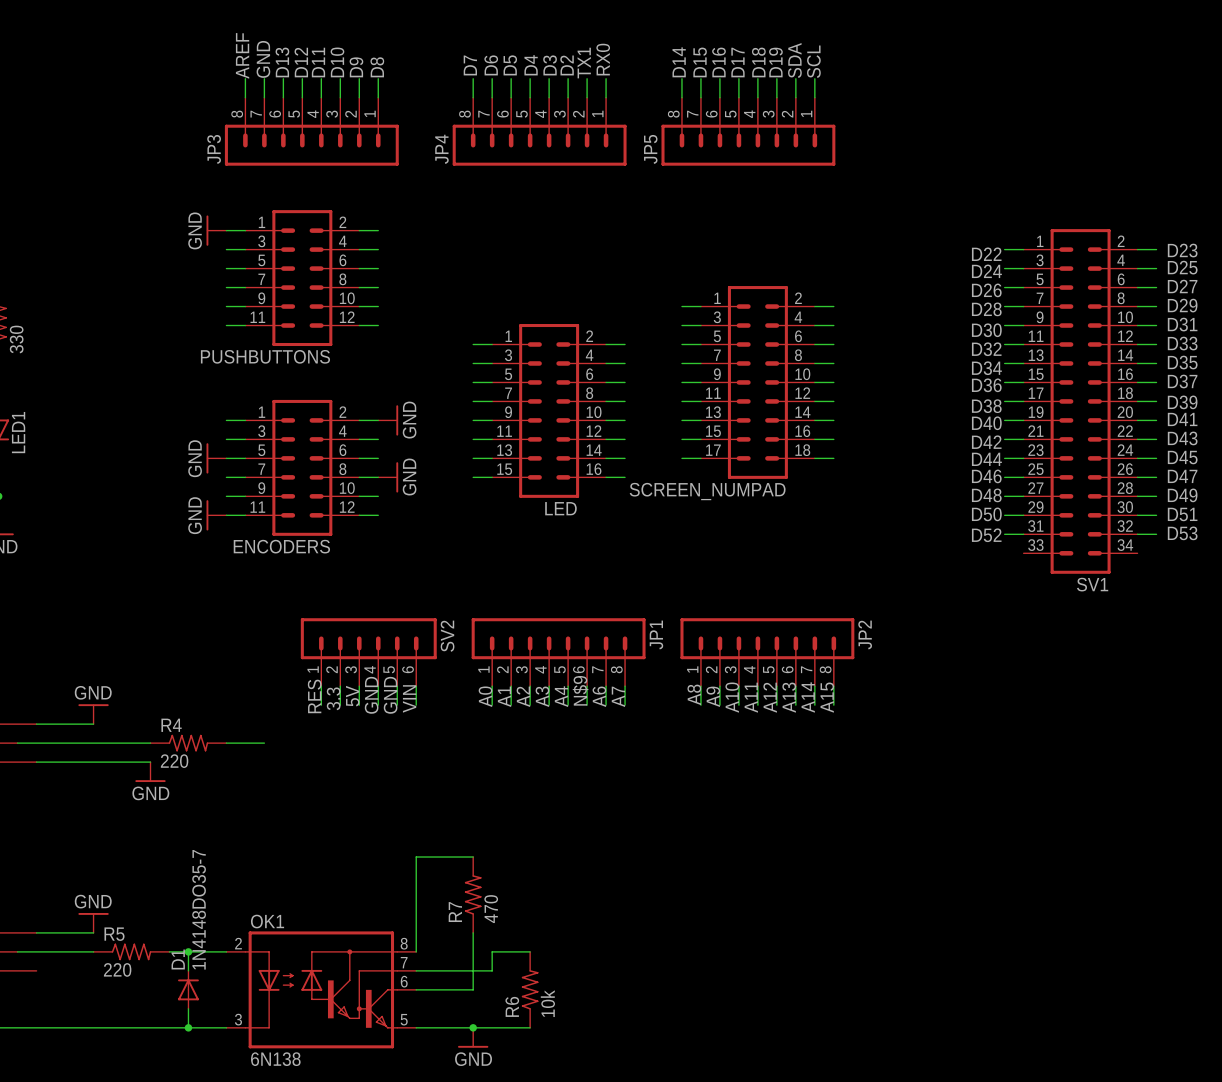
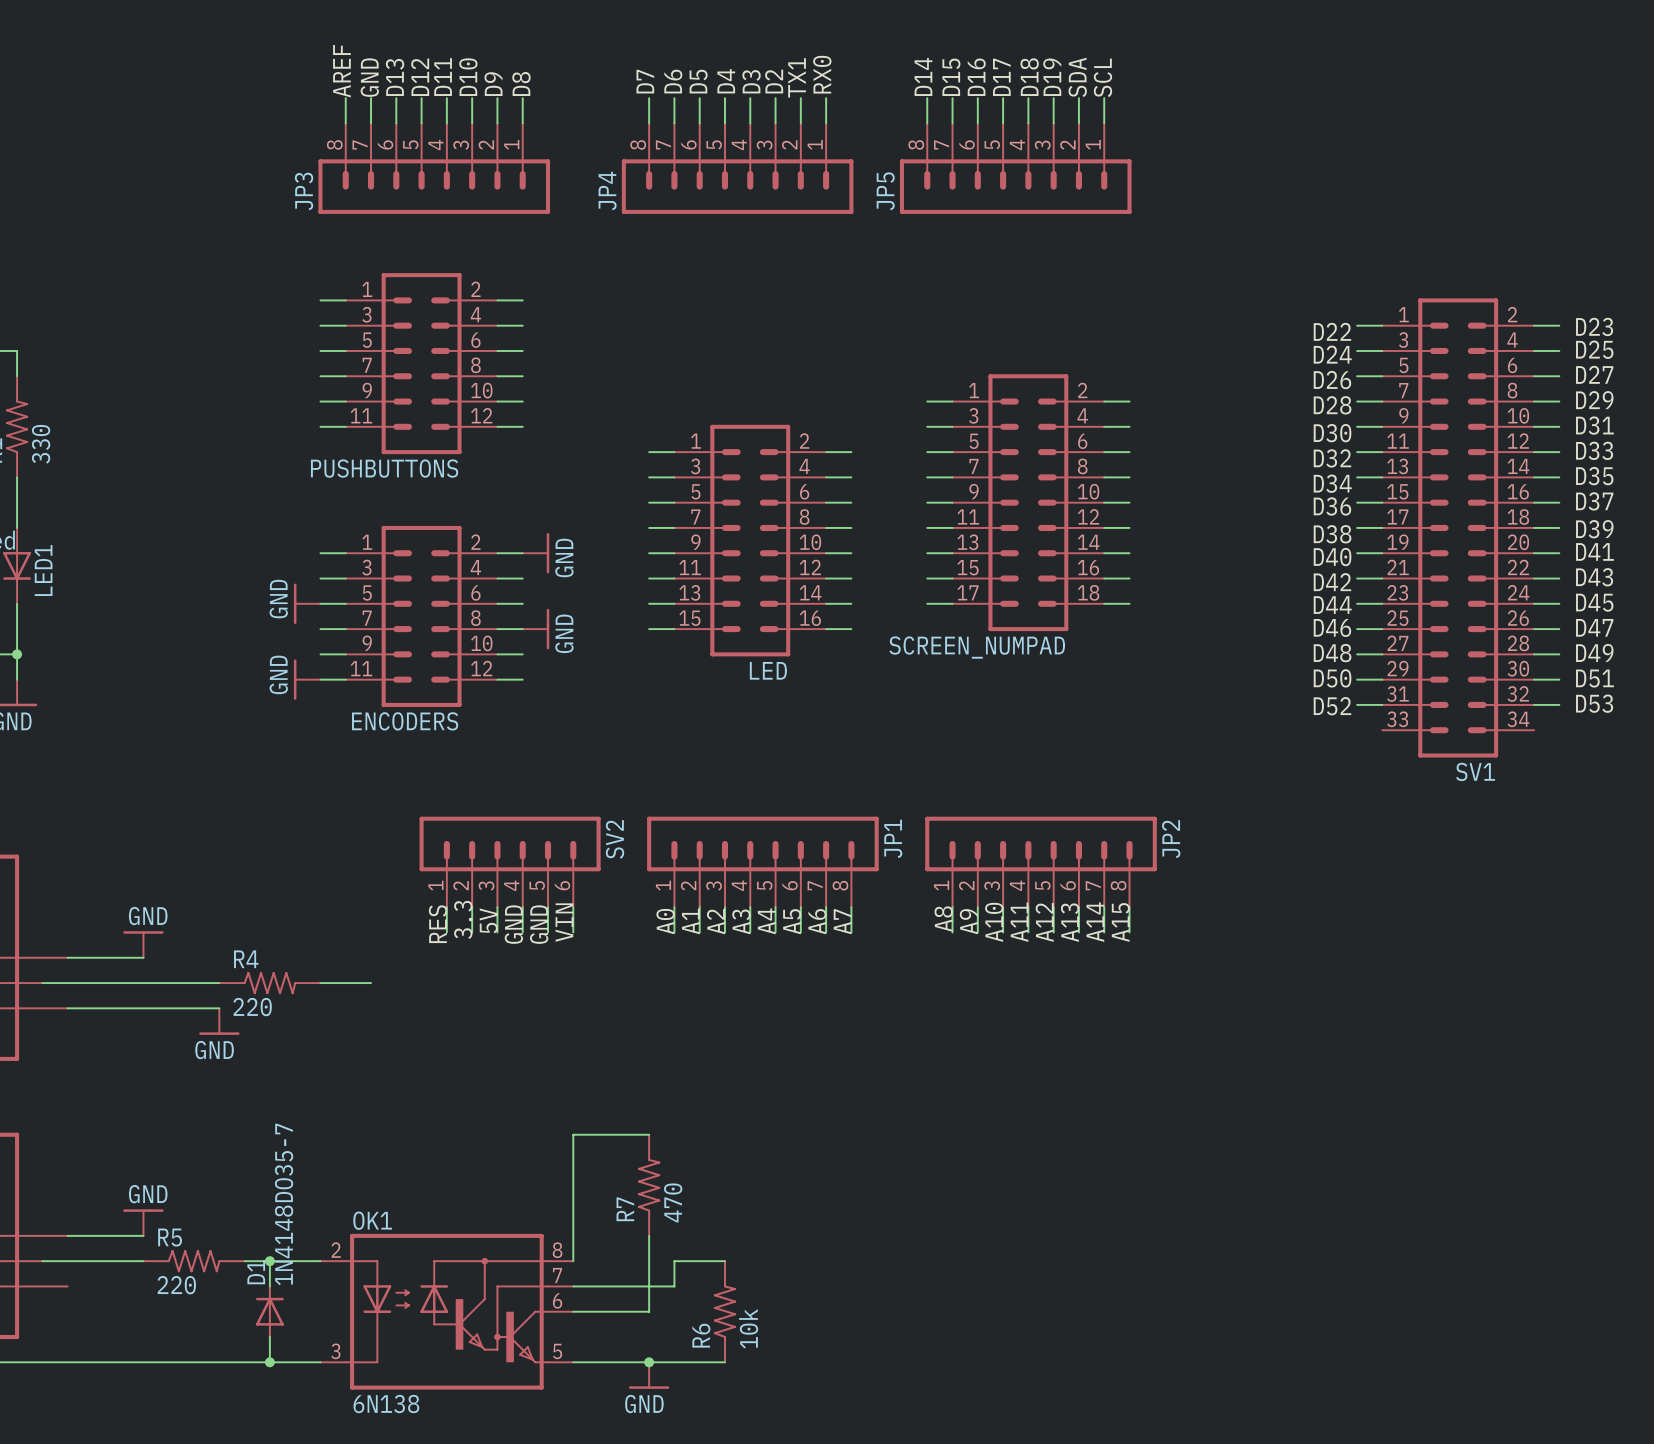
power symbol: GND (216, 230) -> none
label: N$9 (580, 690) -> A5 (792, 921)

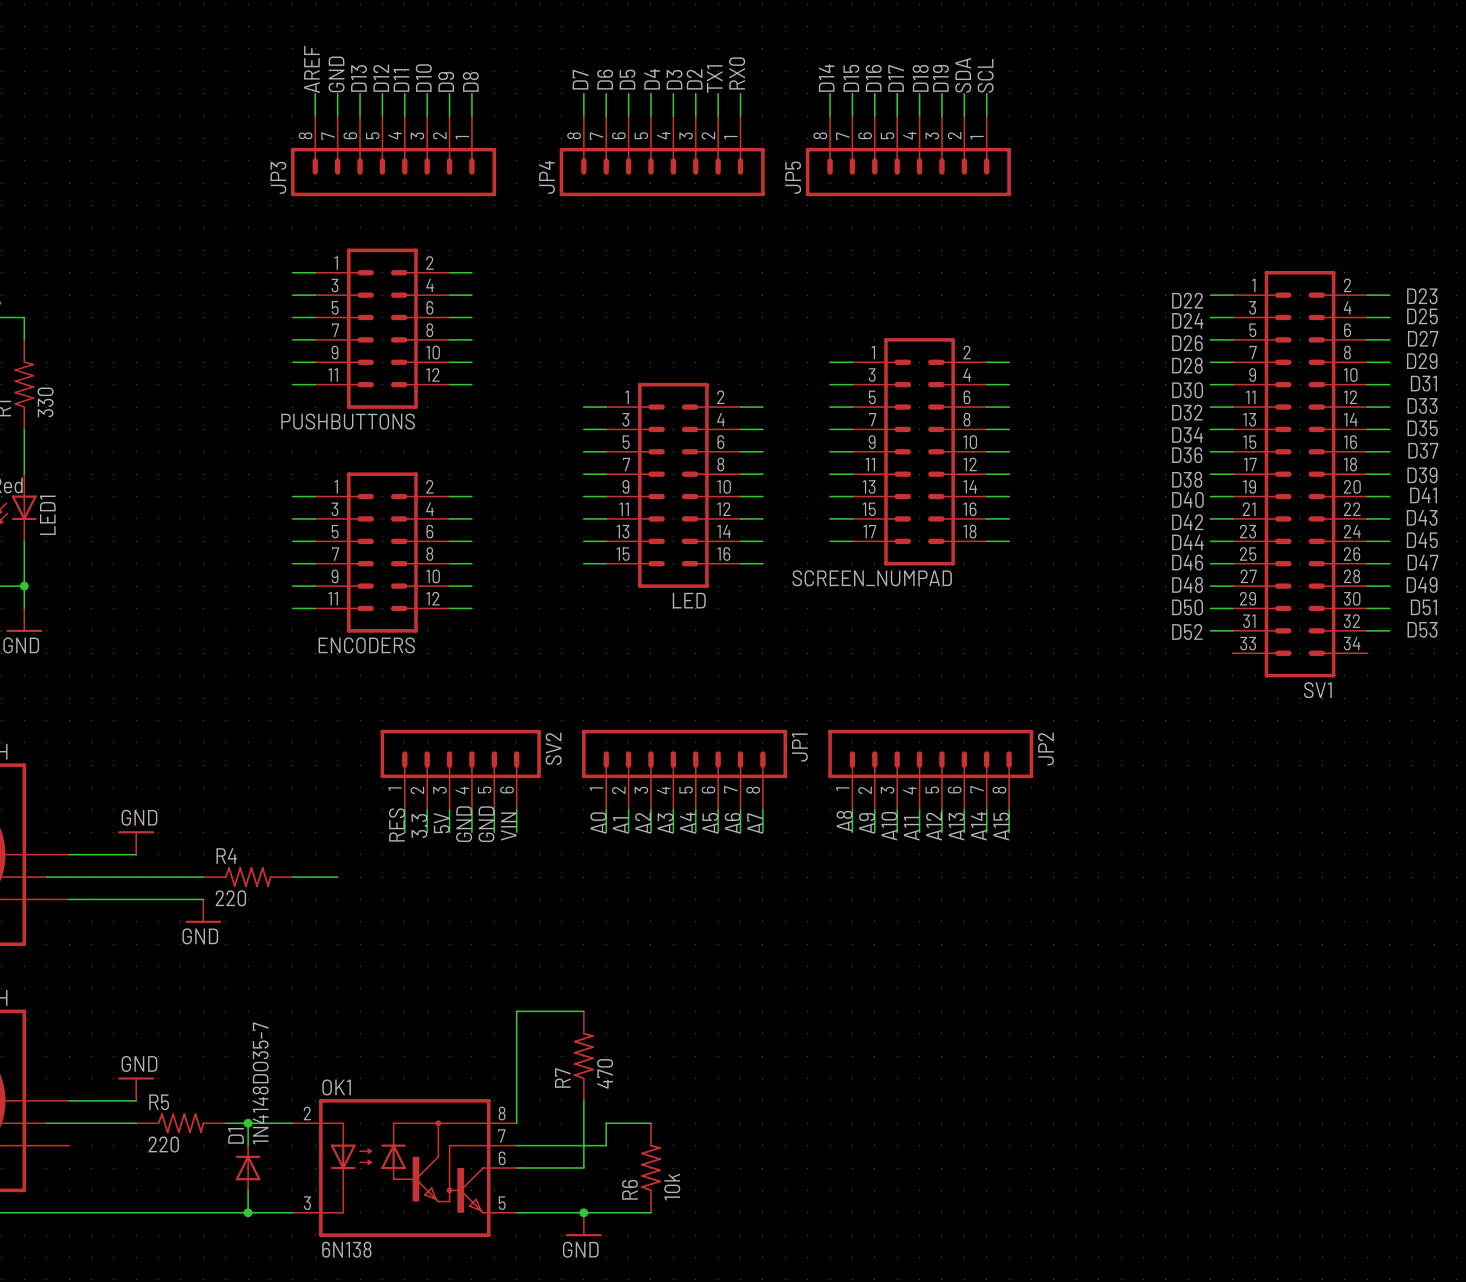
power symbol: GND (536, 553) -> none
power symbol: GND (307, 603) -> none
power symbol: GND (536, 629) -> none
power symbol: GND (307, 679) -> none

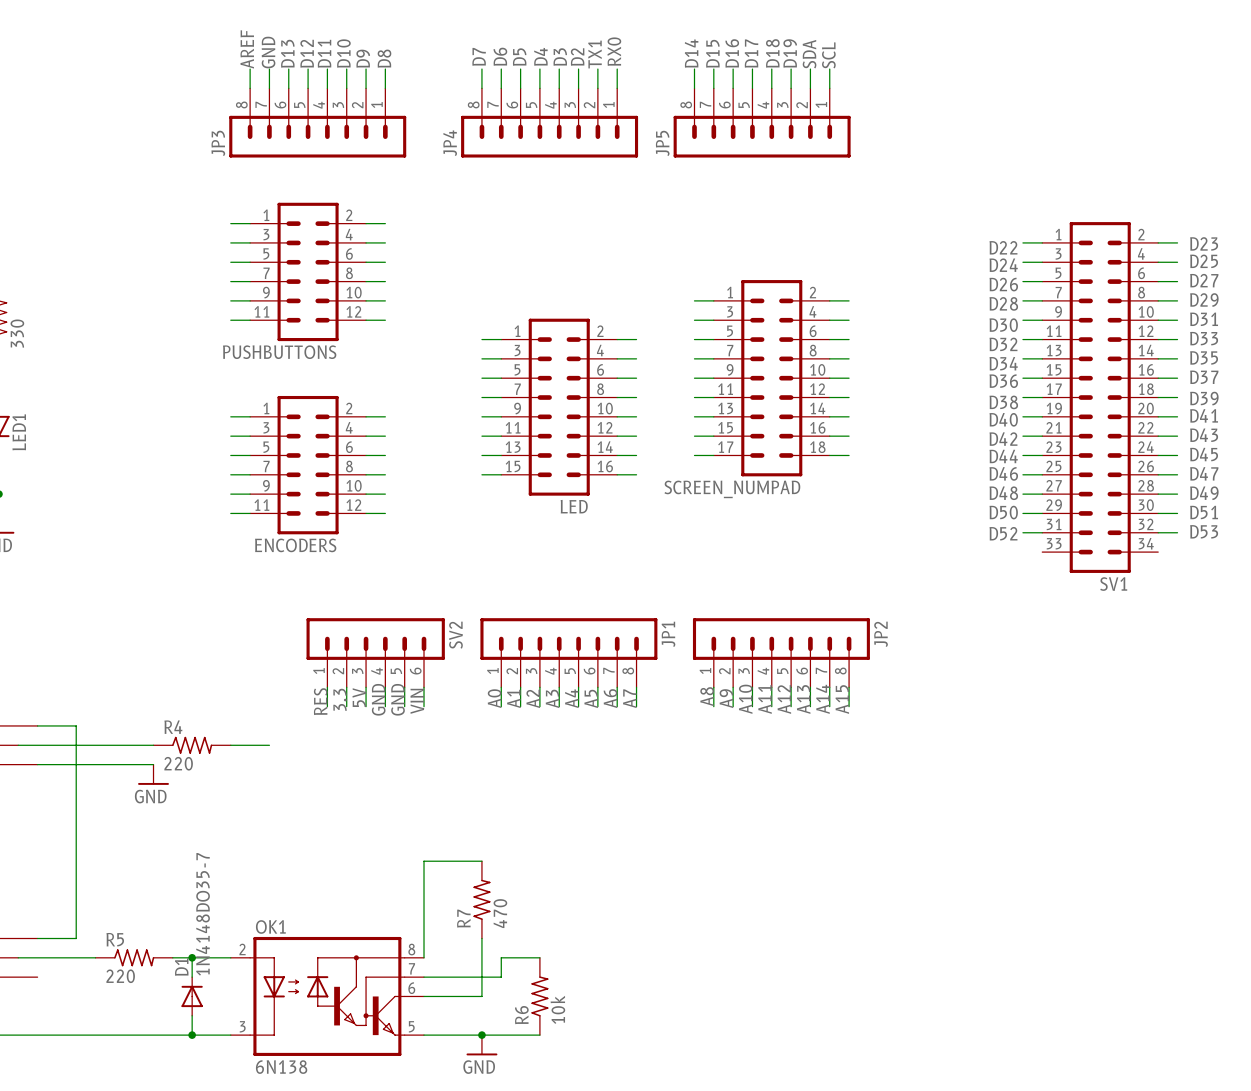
power symbol: GND (136, 842) -> none
wire: (113, 854) (136, 854) -> (76, 725) (76, 938)
power symbol: GND (136, 1089) -> none
wire: (113, 1100) (136, 1100) -> none

